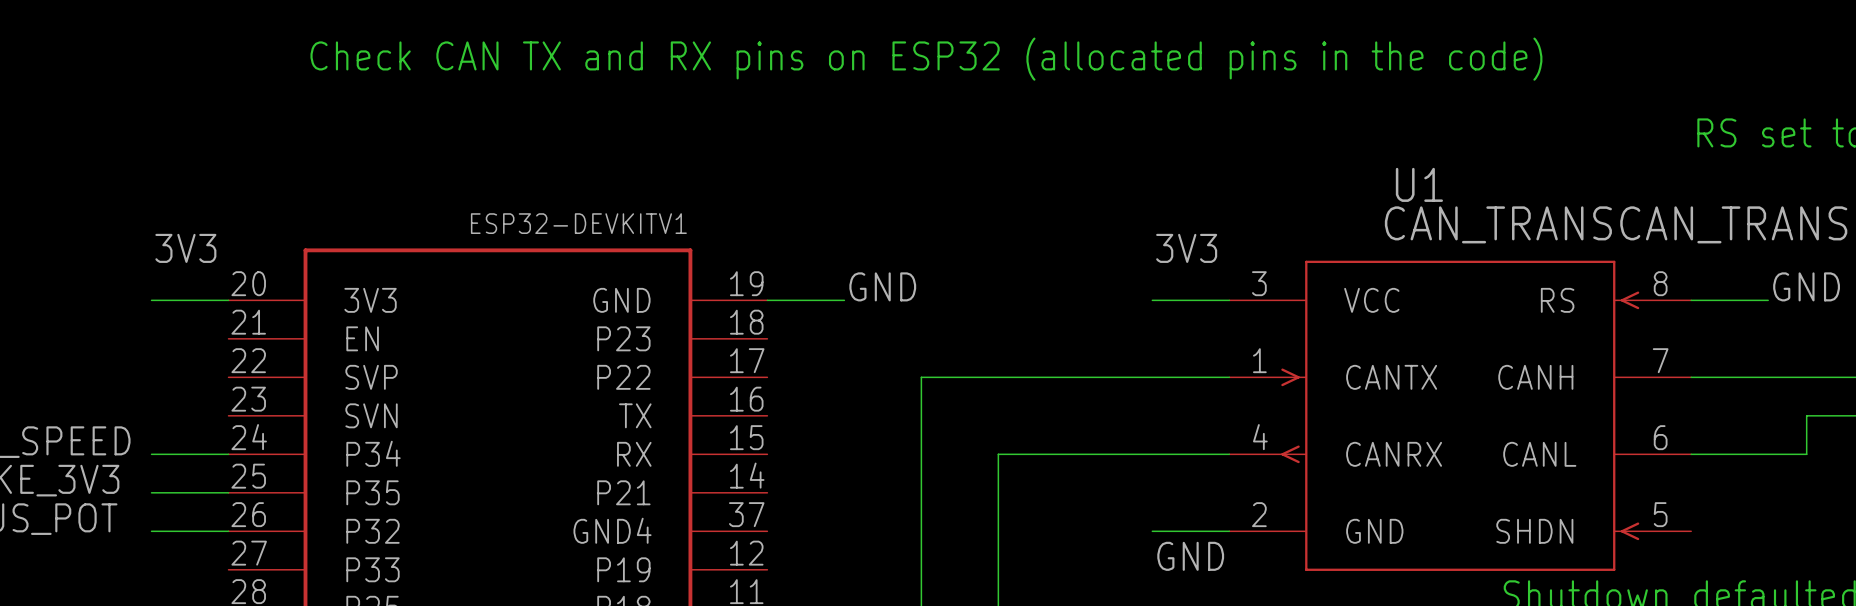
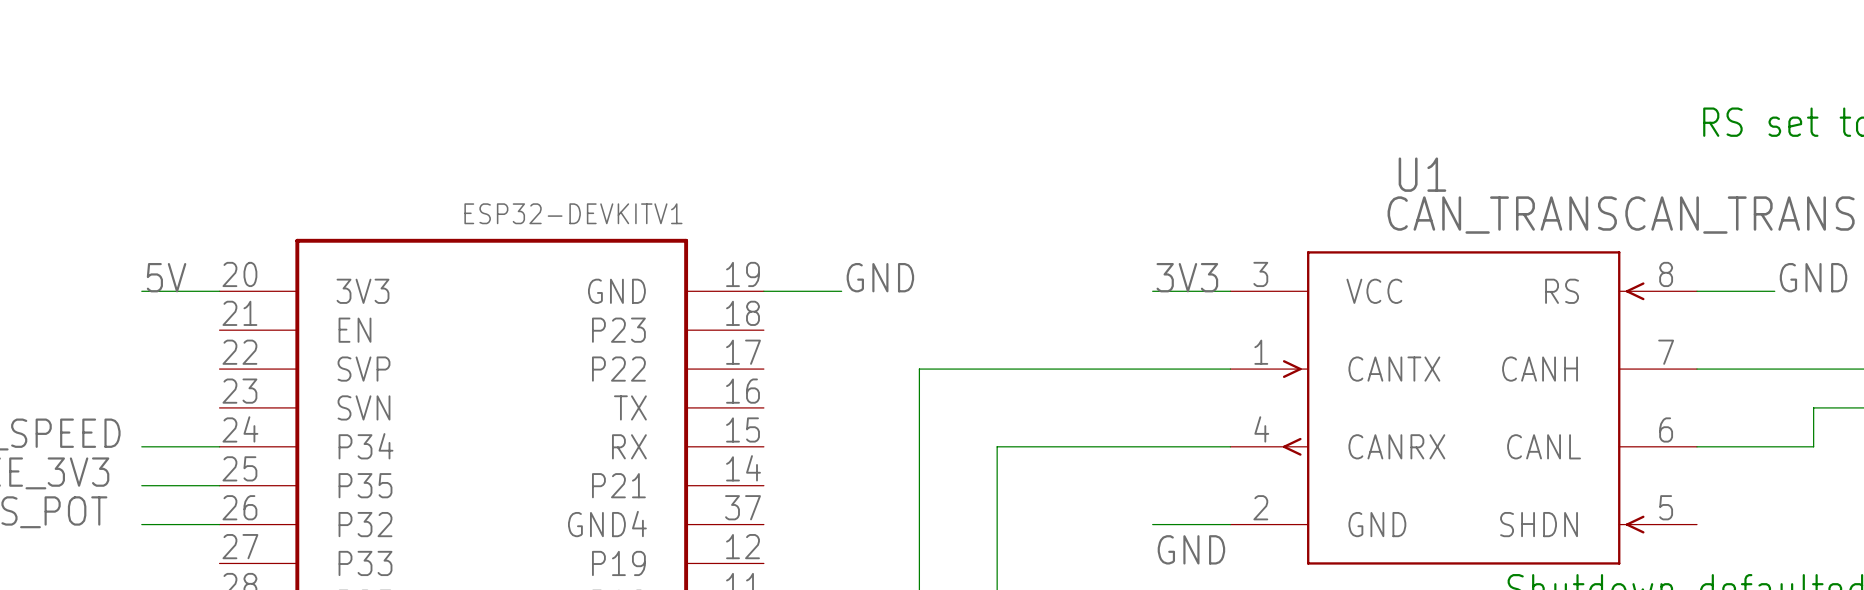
text: Check CAN TX and RX pins on ESP32 (allocated pins in the code) (926, 59) -> none
label: 3V3 (185, 248) -> none
label position: 3V3 (1186, 248) -> 3V3 (1187, 277)
label: none -> 5V (166, 277)

